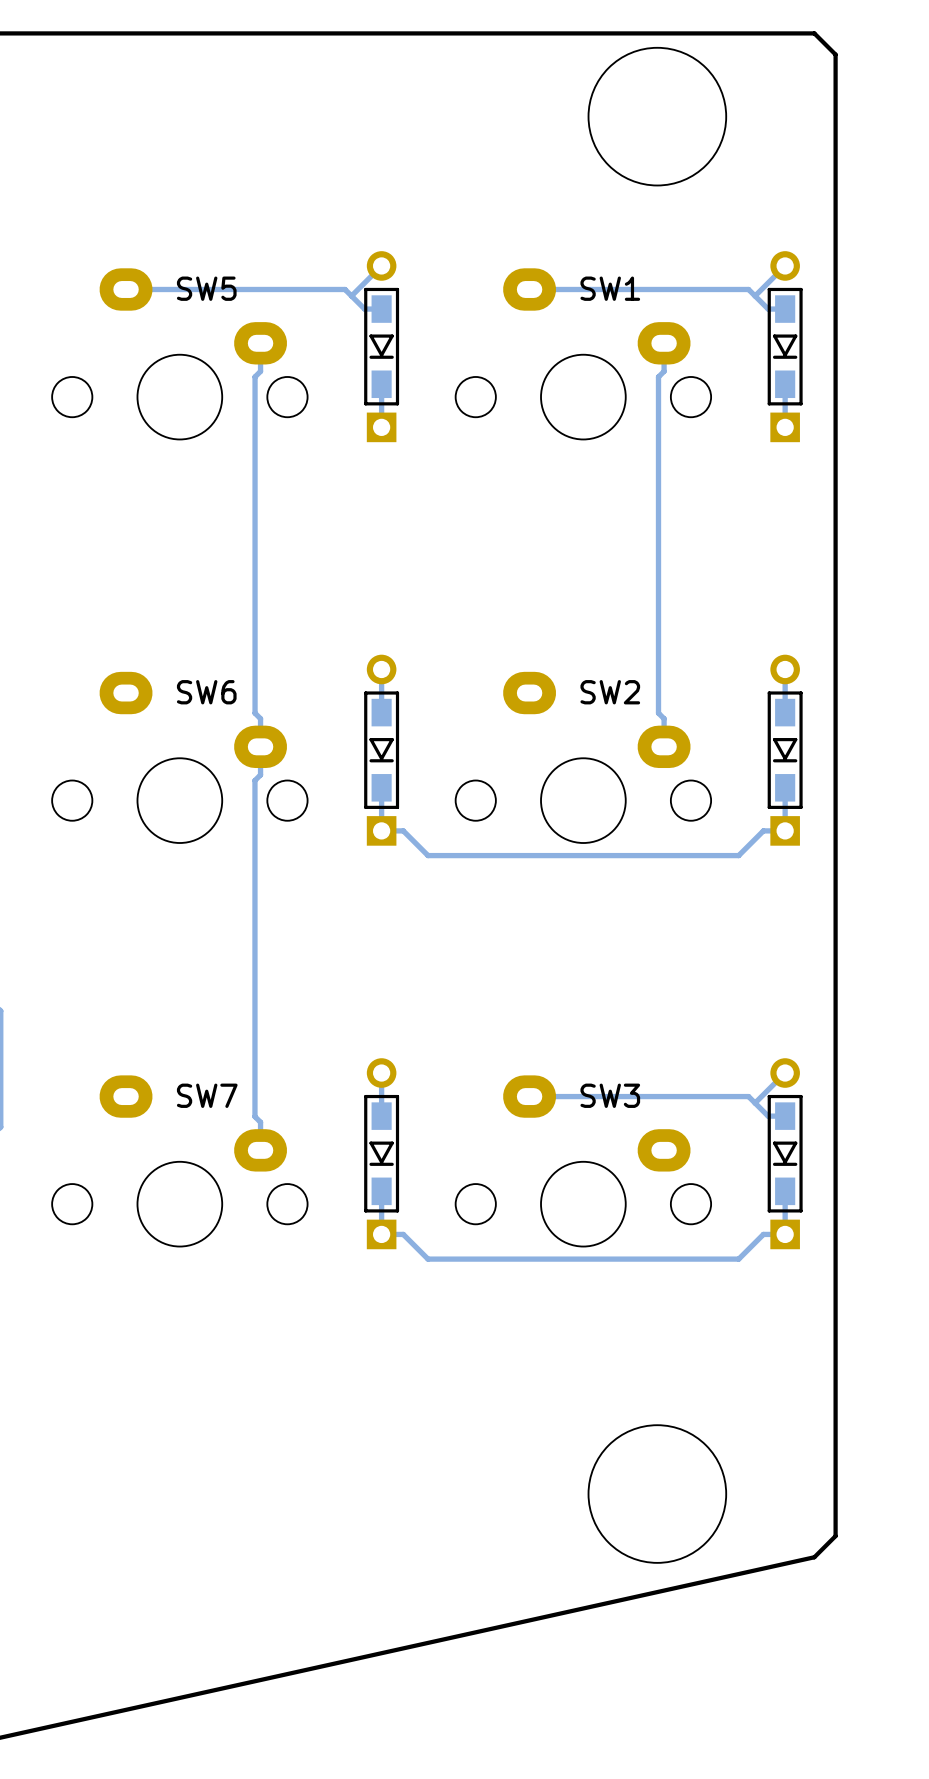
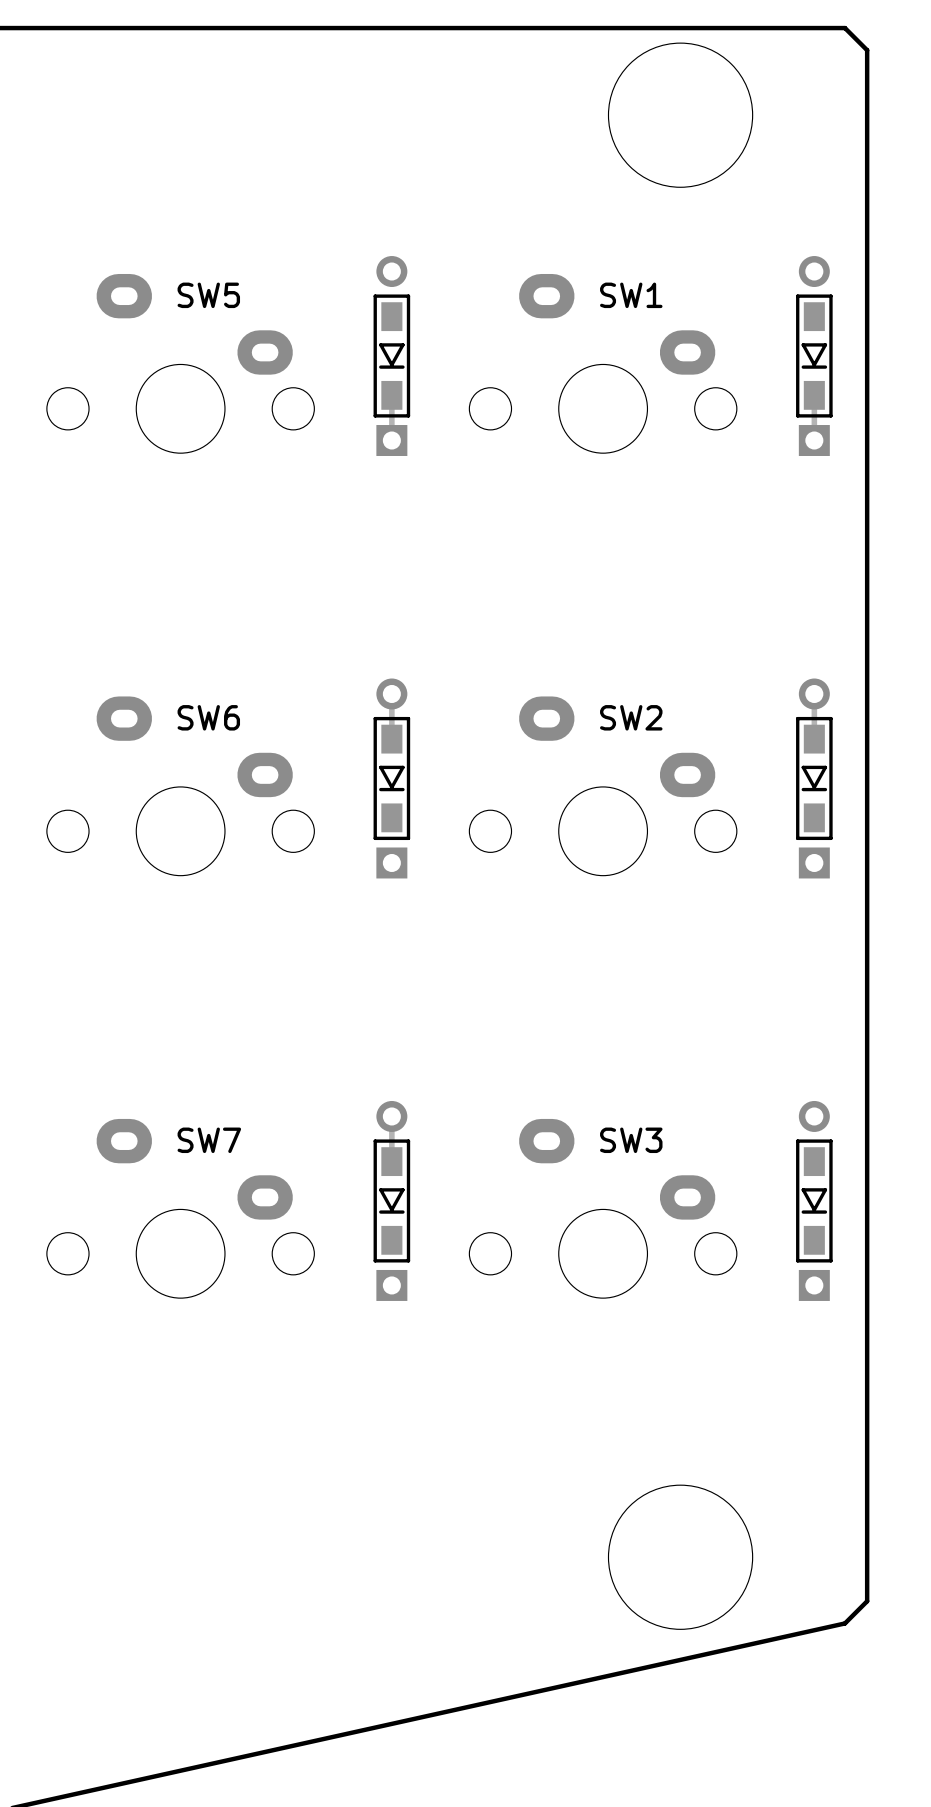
track: (381, 265) (351, 296) -> none
track: (785, 265) (755, 296) -> none
track: (126, 289) (345, 289) (364, 309) (381, 309) -> none
track: (529, 289) (748, 289) (768, 309) (785, 309) -> none
track: (260, 343) (260, 371) (255, 376) (255, 713) (260, 718) (260, 774) (254, 780) (254, 1116) (260, 1122) (260, 1150) -> none
track: (664, 343) (664, 371) (658, 376) (658, 713) (664, 718) (664, 746) -> none
track: (785, 787) (785, 830) (763, 830) (738, 855) (428, 855) (403, 830) (381, 830) (381, 787) -> none
track: (785, 1073) (755, 1103) -> none
track: (529, 1096) (748, 1096) (768, 1116) (785, 1116) -> none
track: (785, 1191) (785, 1234) (763, 1234) (738, 1259) (428, 1259) (403, 1234) (381, 1234) (381, 1191) -> none

